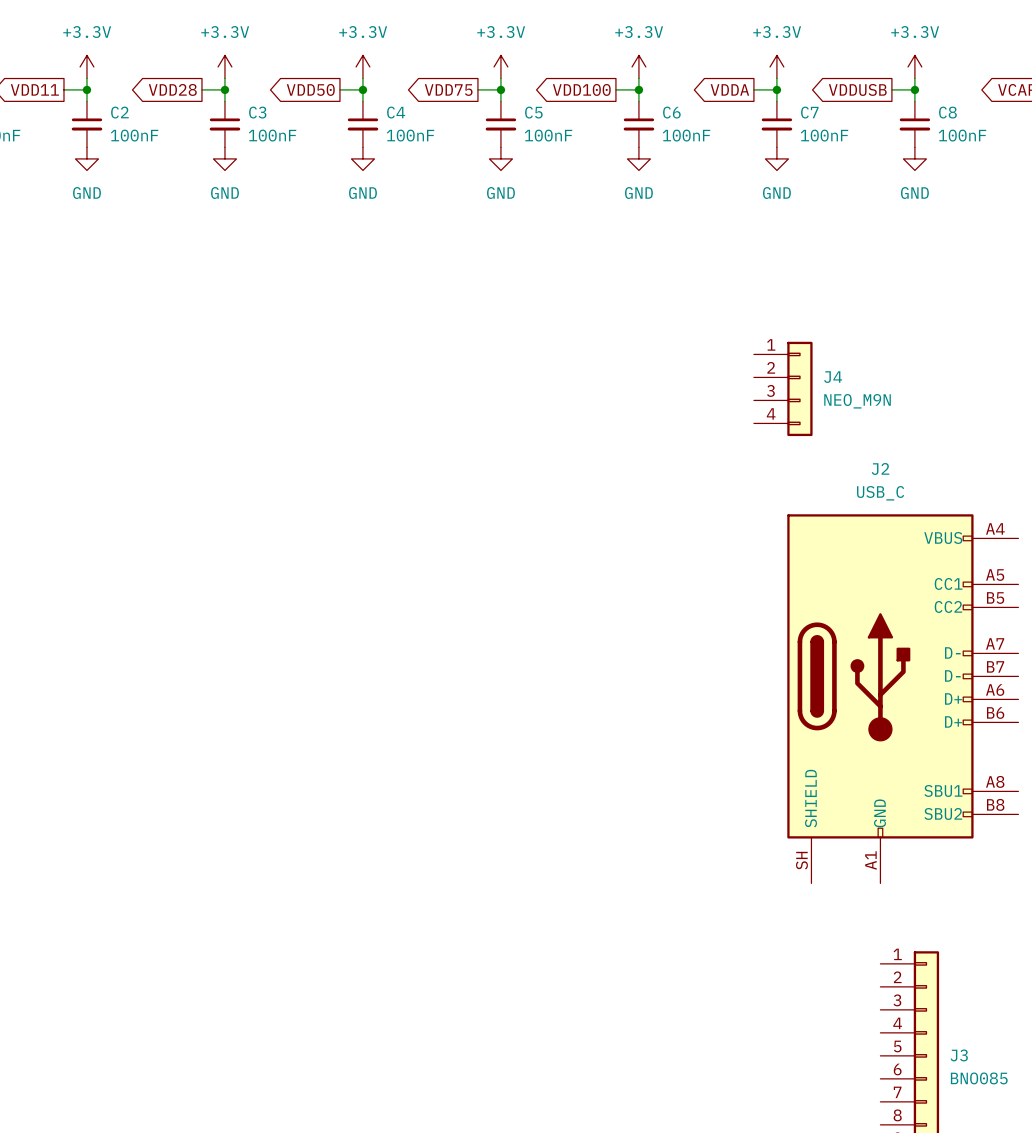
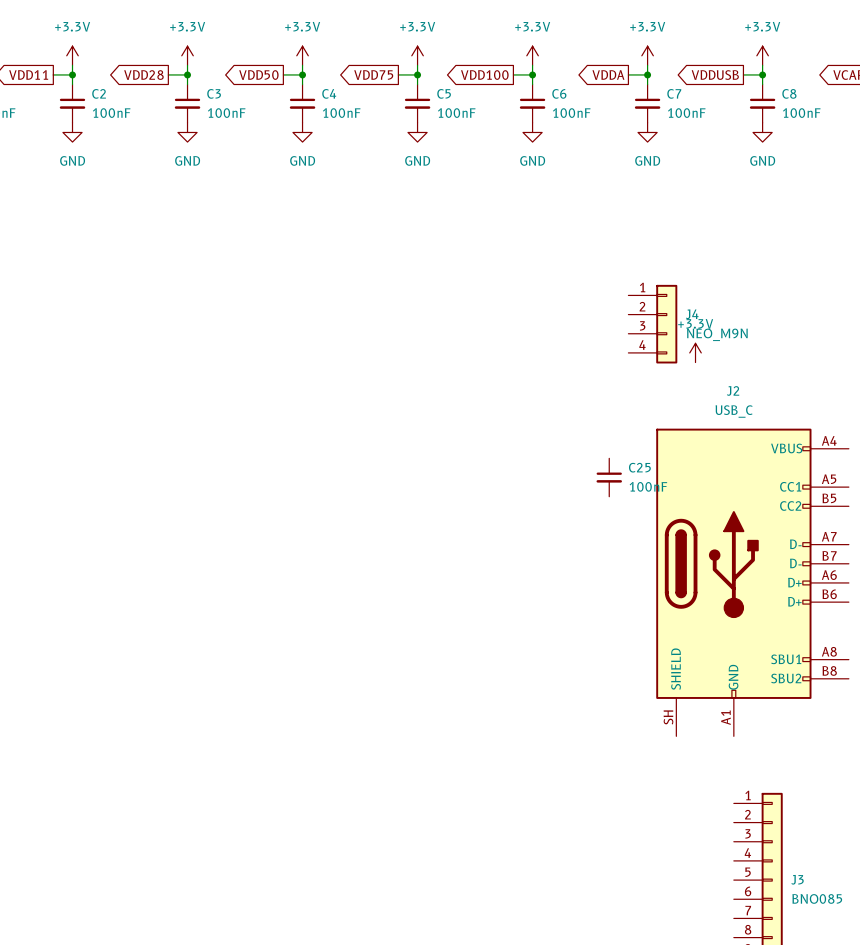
power symbol: none -> +3.3V (695, 352)
C25: none -> 100nF (609, 477)

